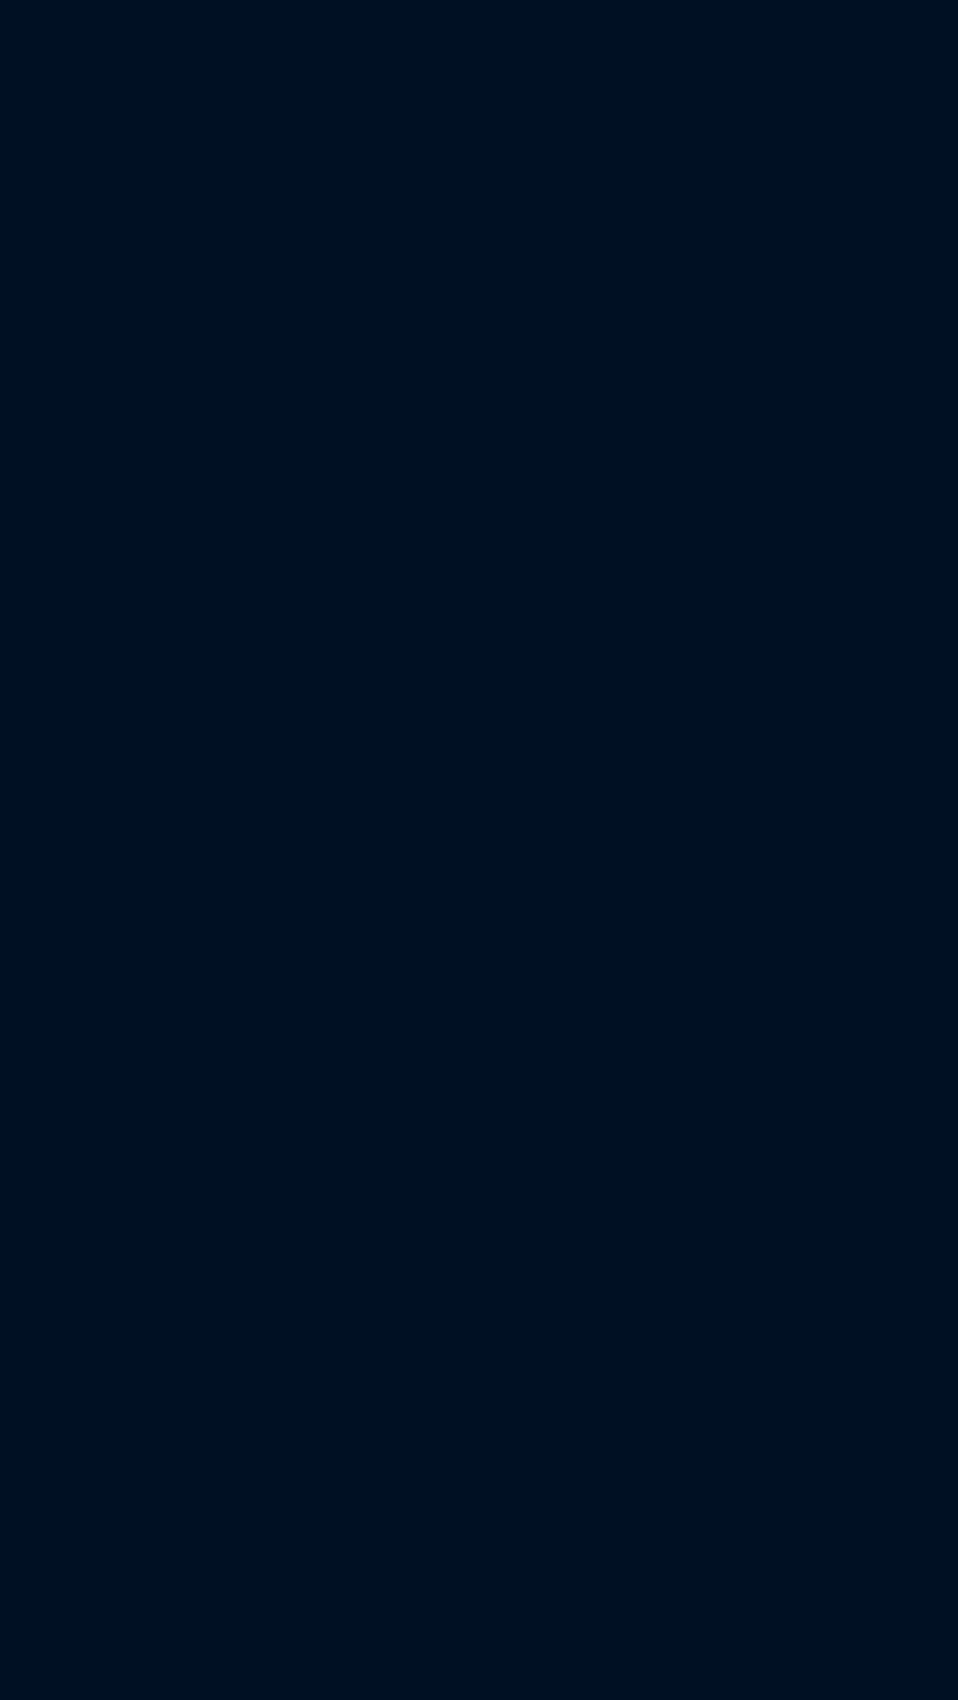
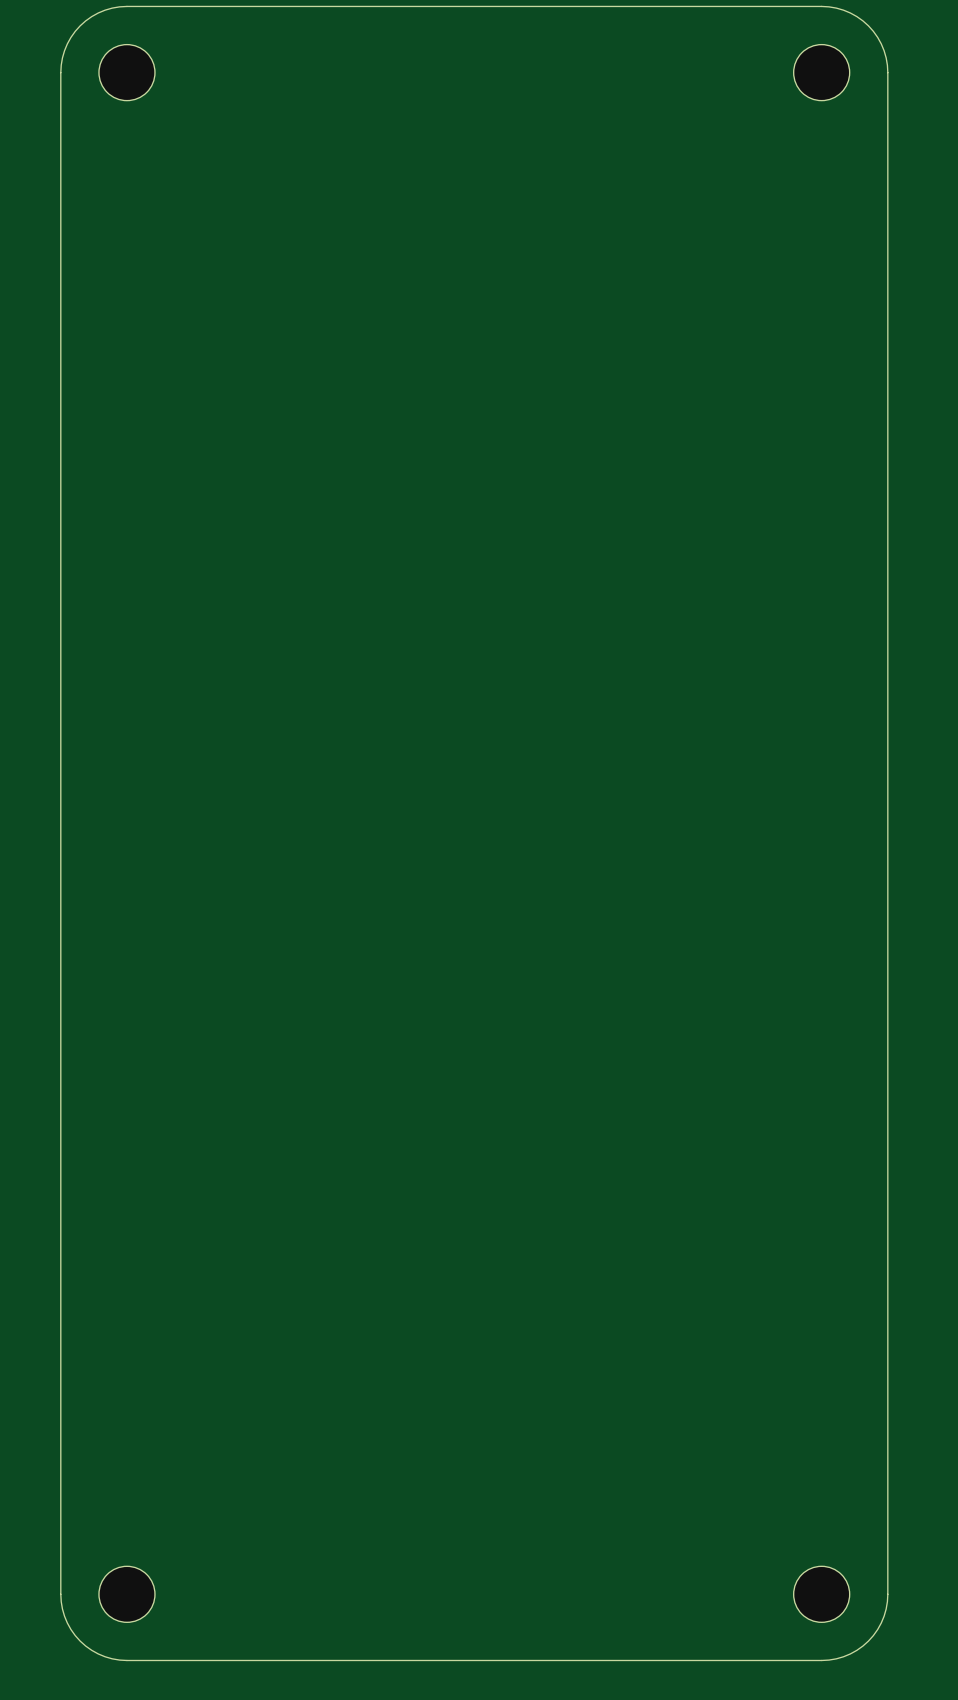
board edge: none -> (821, 6) (126, 6) (105, 10) (91, 16) (75, 31) (67, 43) (62, 57) (60, 72) (60, 1594) (62, 1609) (70, 1629) (85, 1646) (98, 1653) (112, 1658) (126, 1660) (821, 1660) (843, 1656) (856, 1650) (868, 1641) (881, 1623) (886, 1609) (887, 1594) (887, 72) (884, 50) (877, 37) (868, 25) (856, 16) (843, 10) (821, 6)
part: none -> (126, 72)
part: none -> (821, 72)
part: none -> (126, 1594)
part: none -> (821, 1594)

